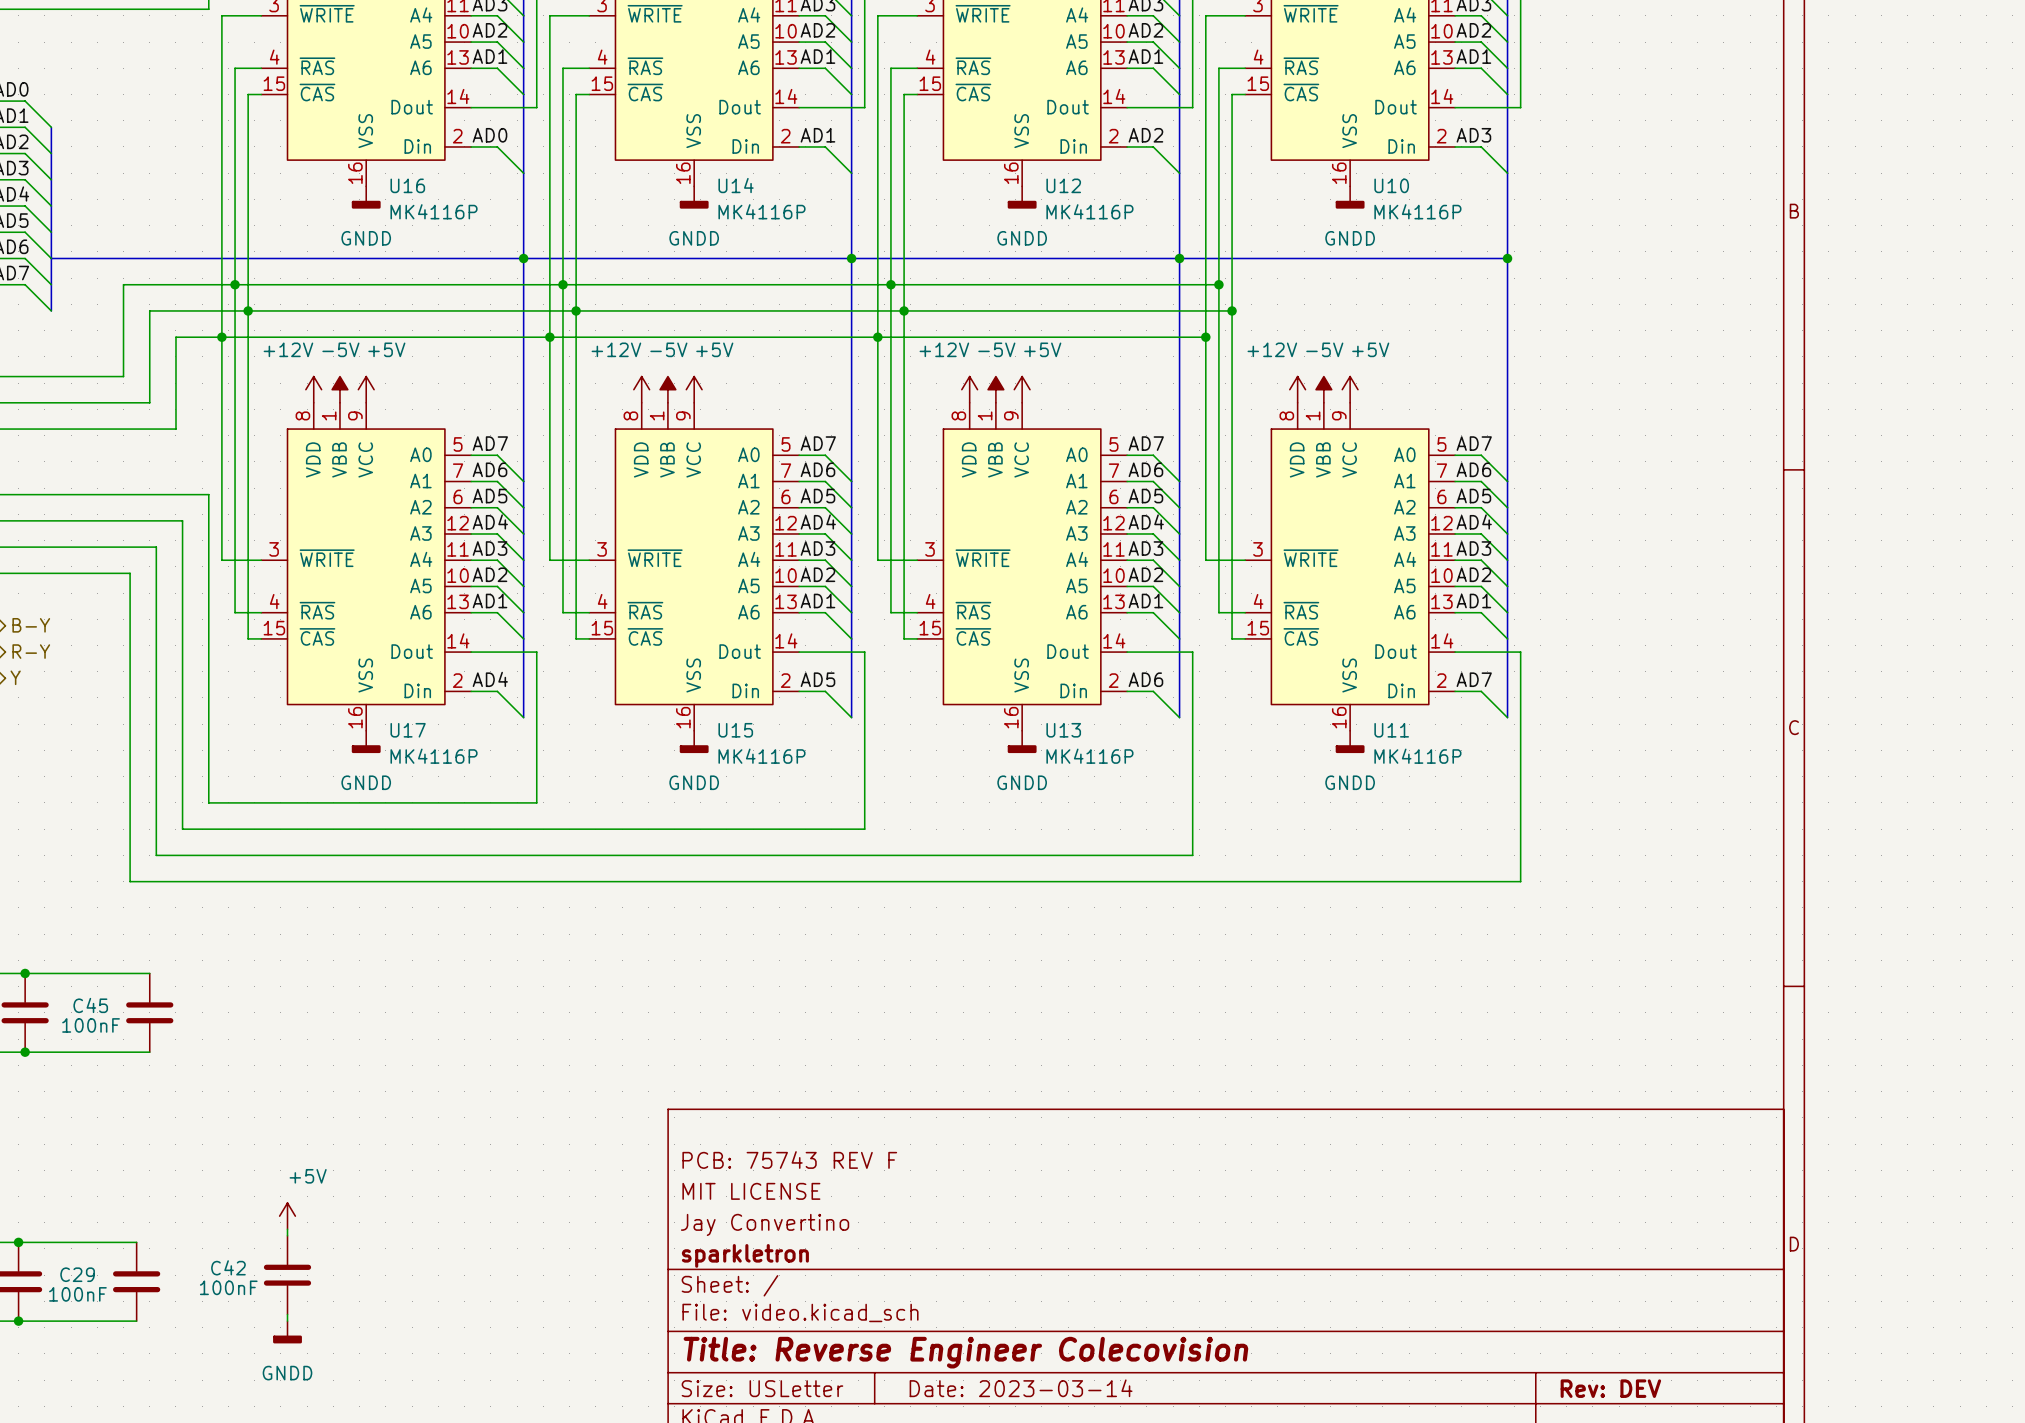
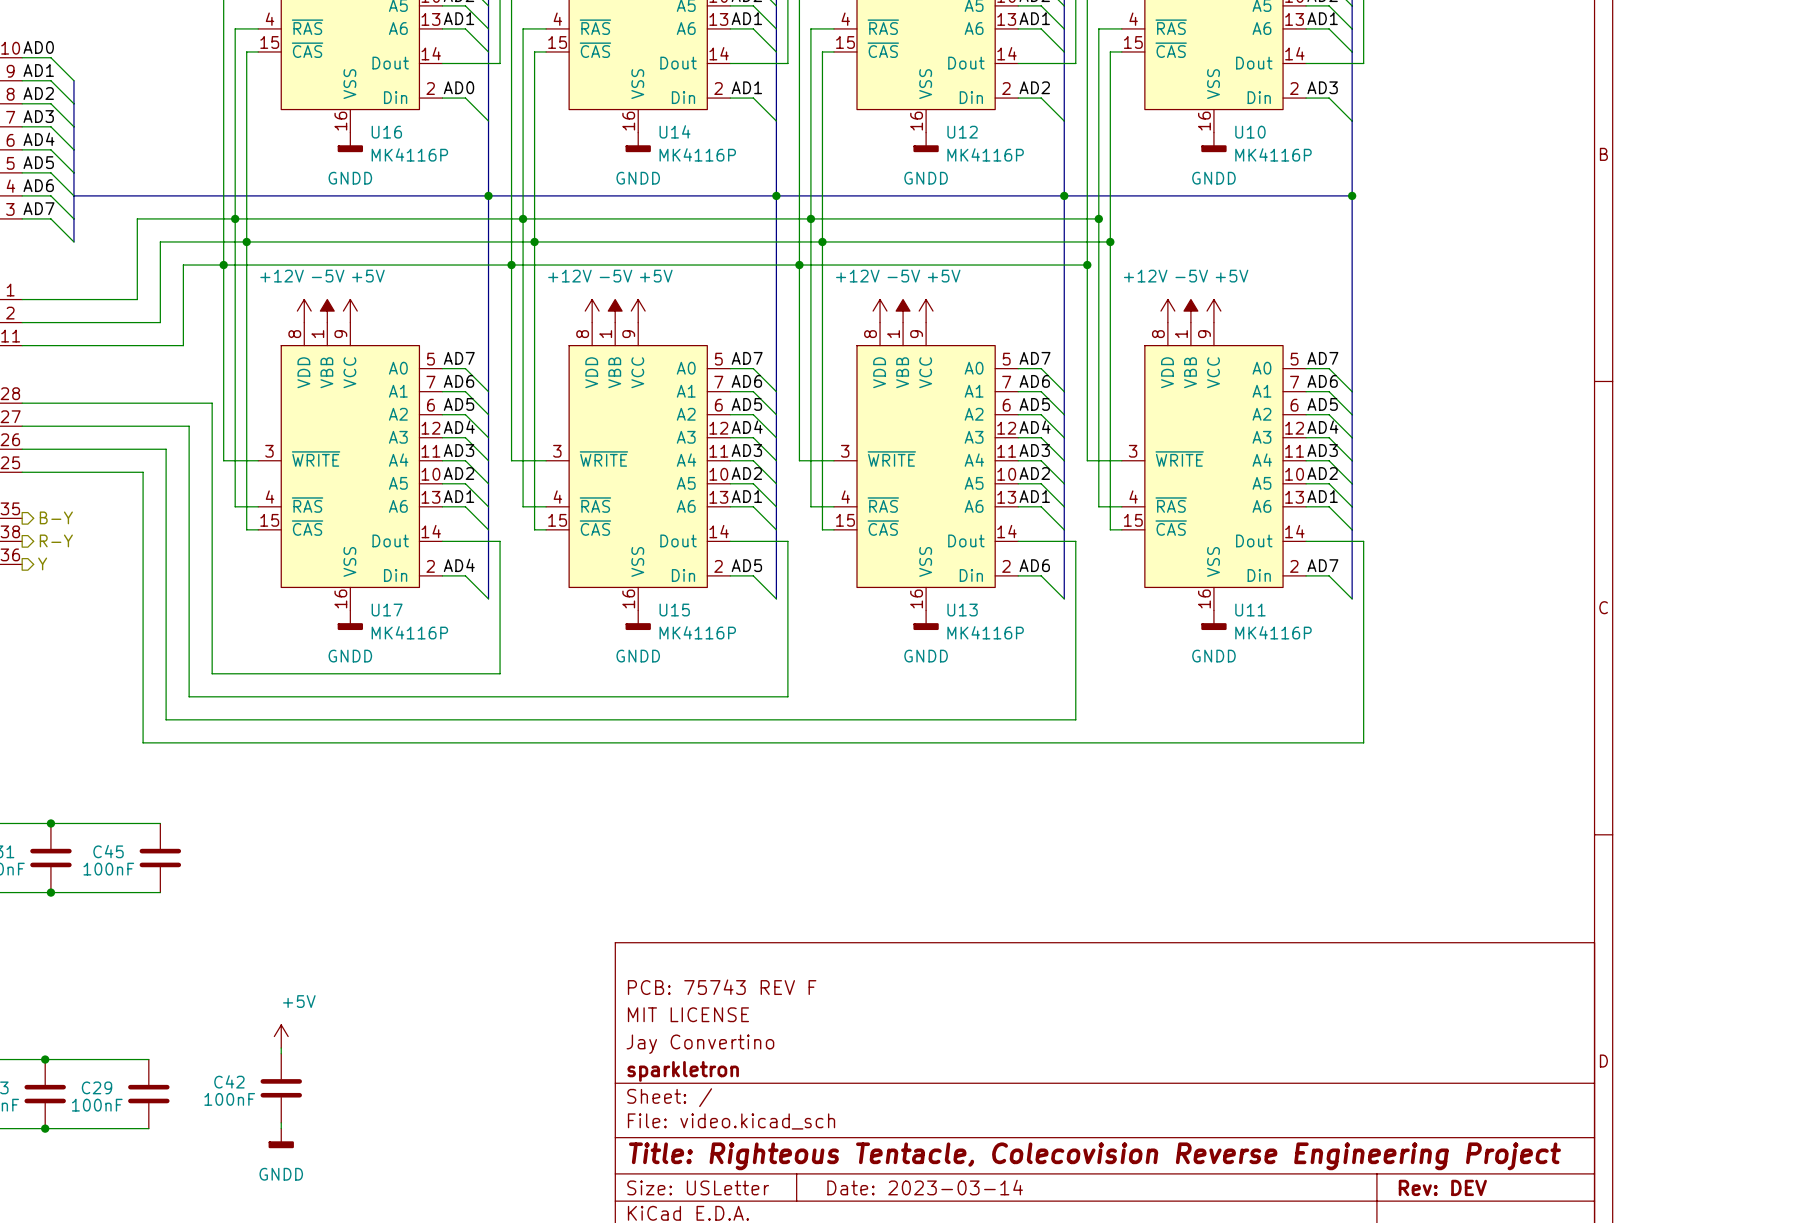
title block: Title: Reverse Engineer Colecovision (965, 1352) -> Title: Righteous Tentacle, Colecovision Reverse Engineering Project (1094, 1156)

